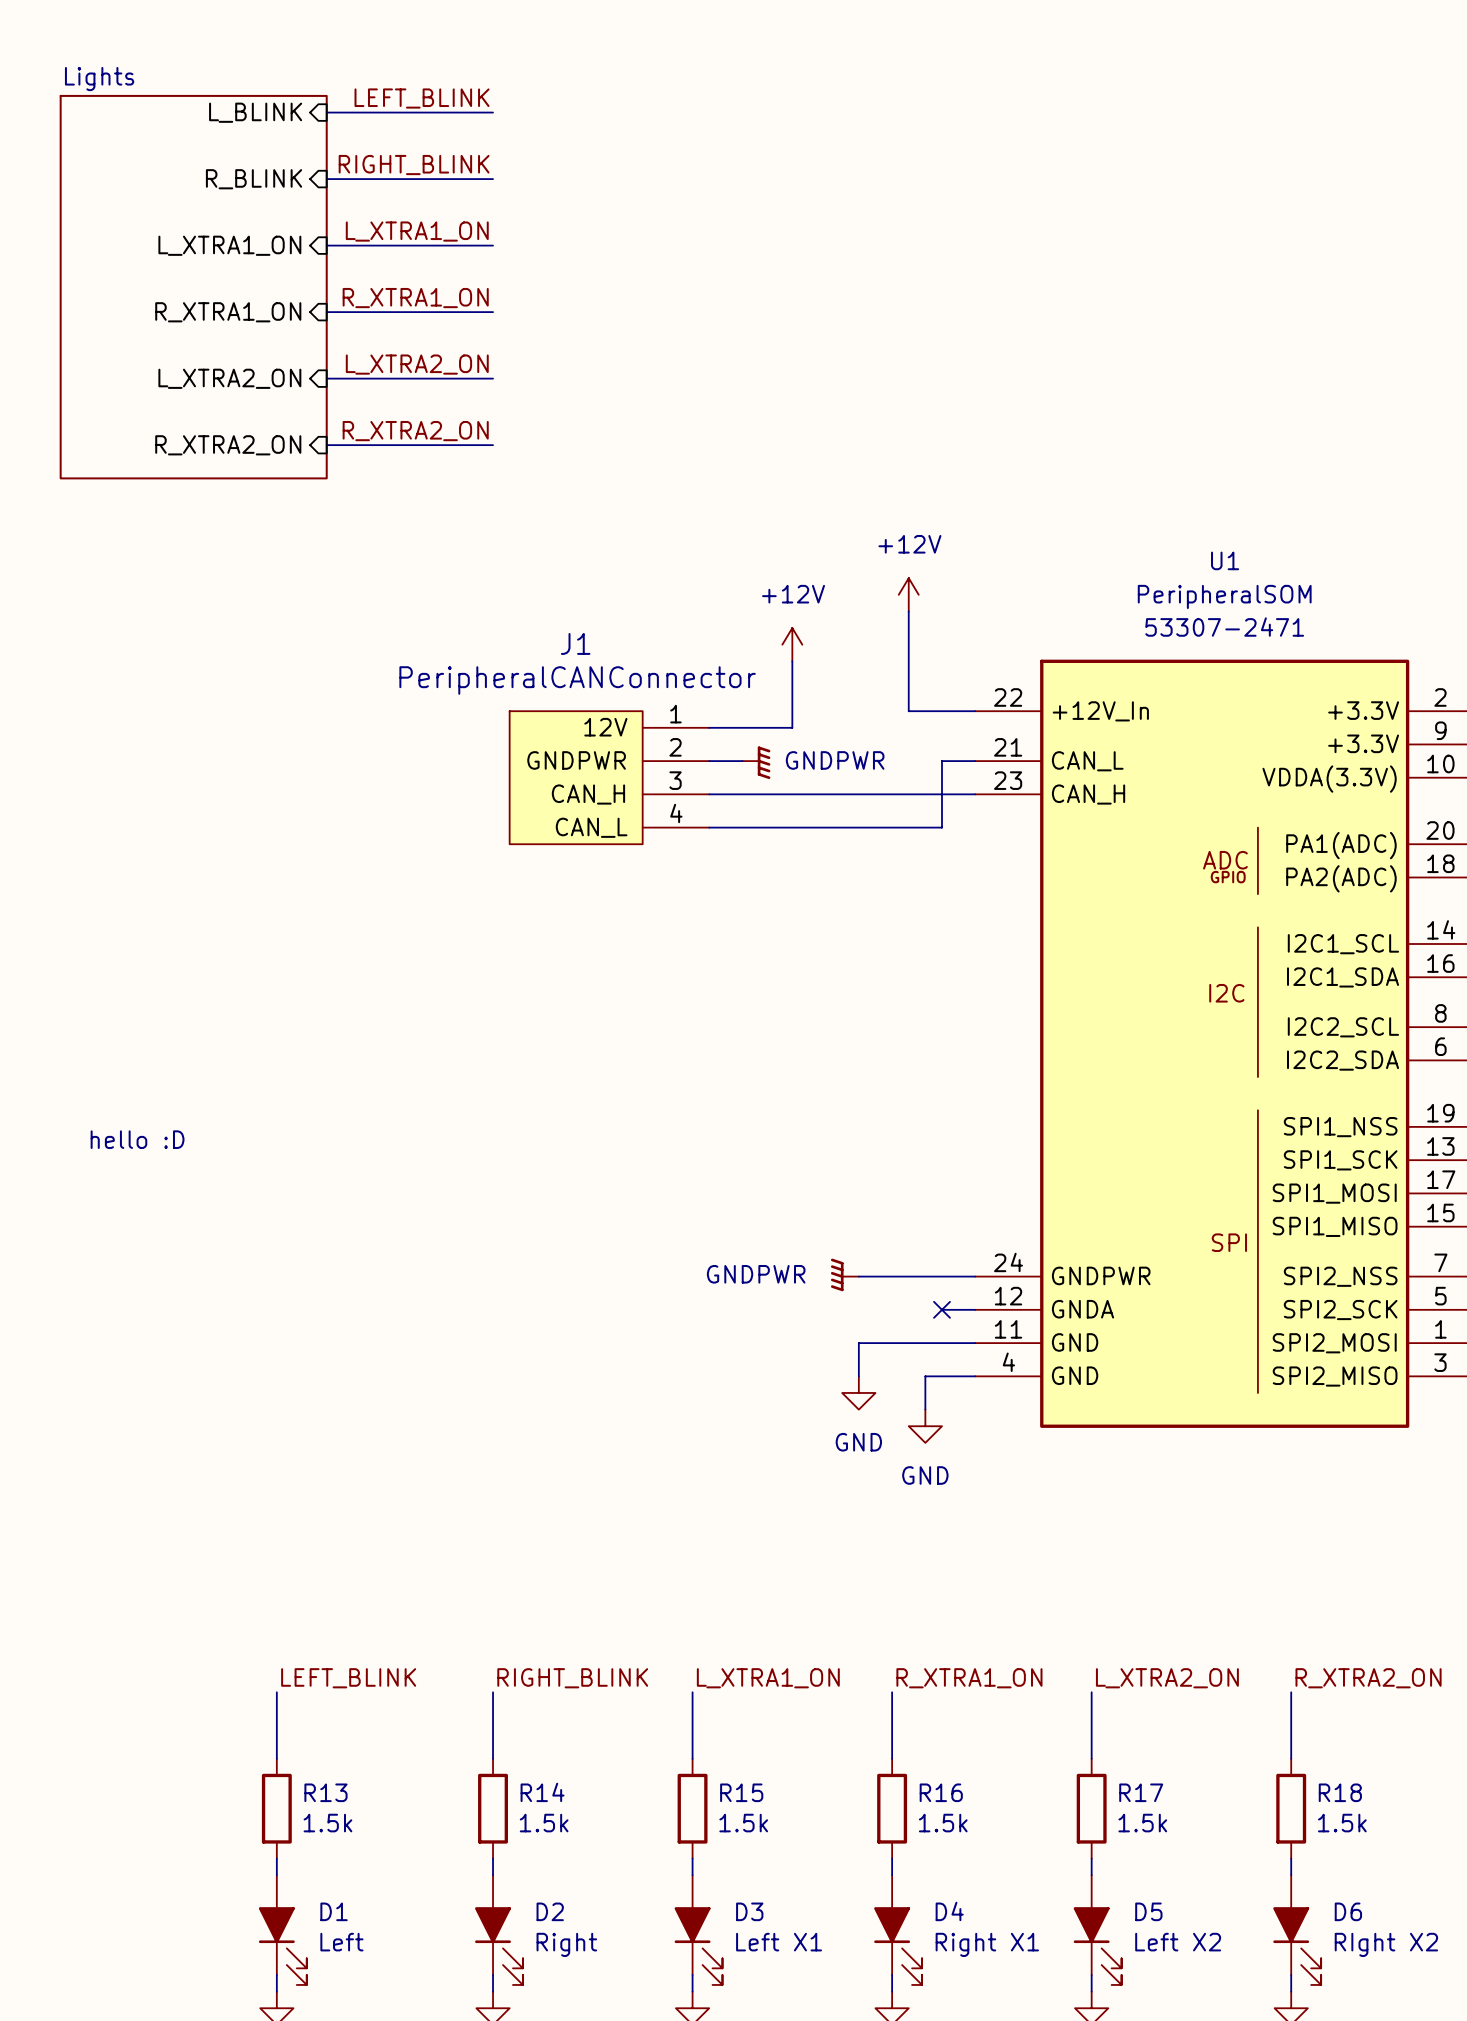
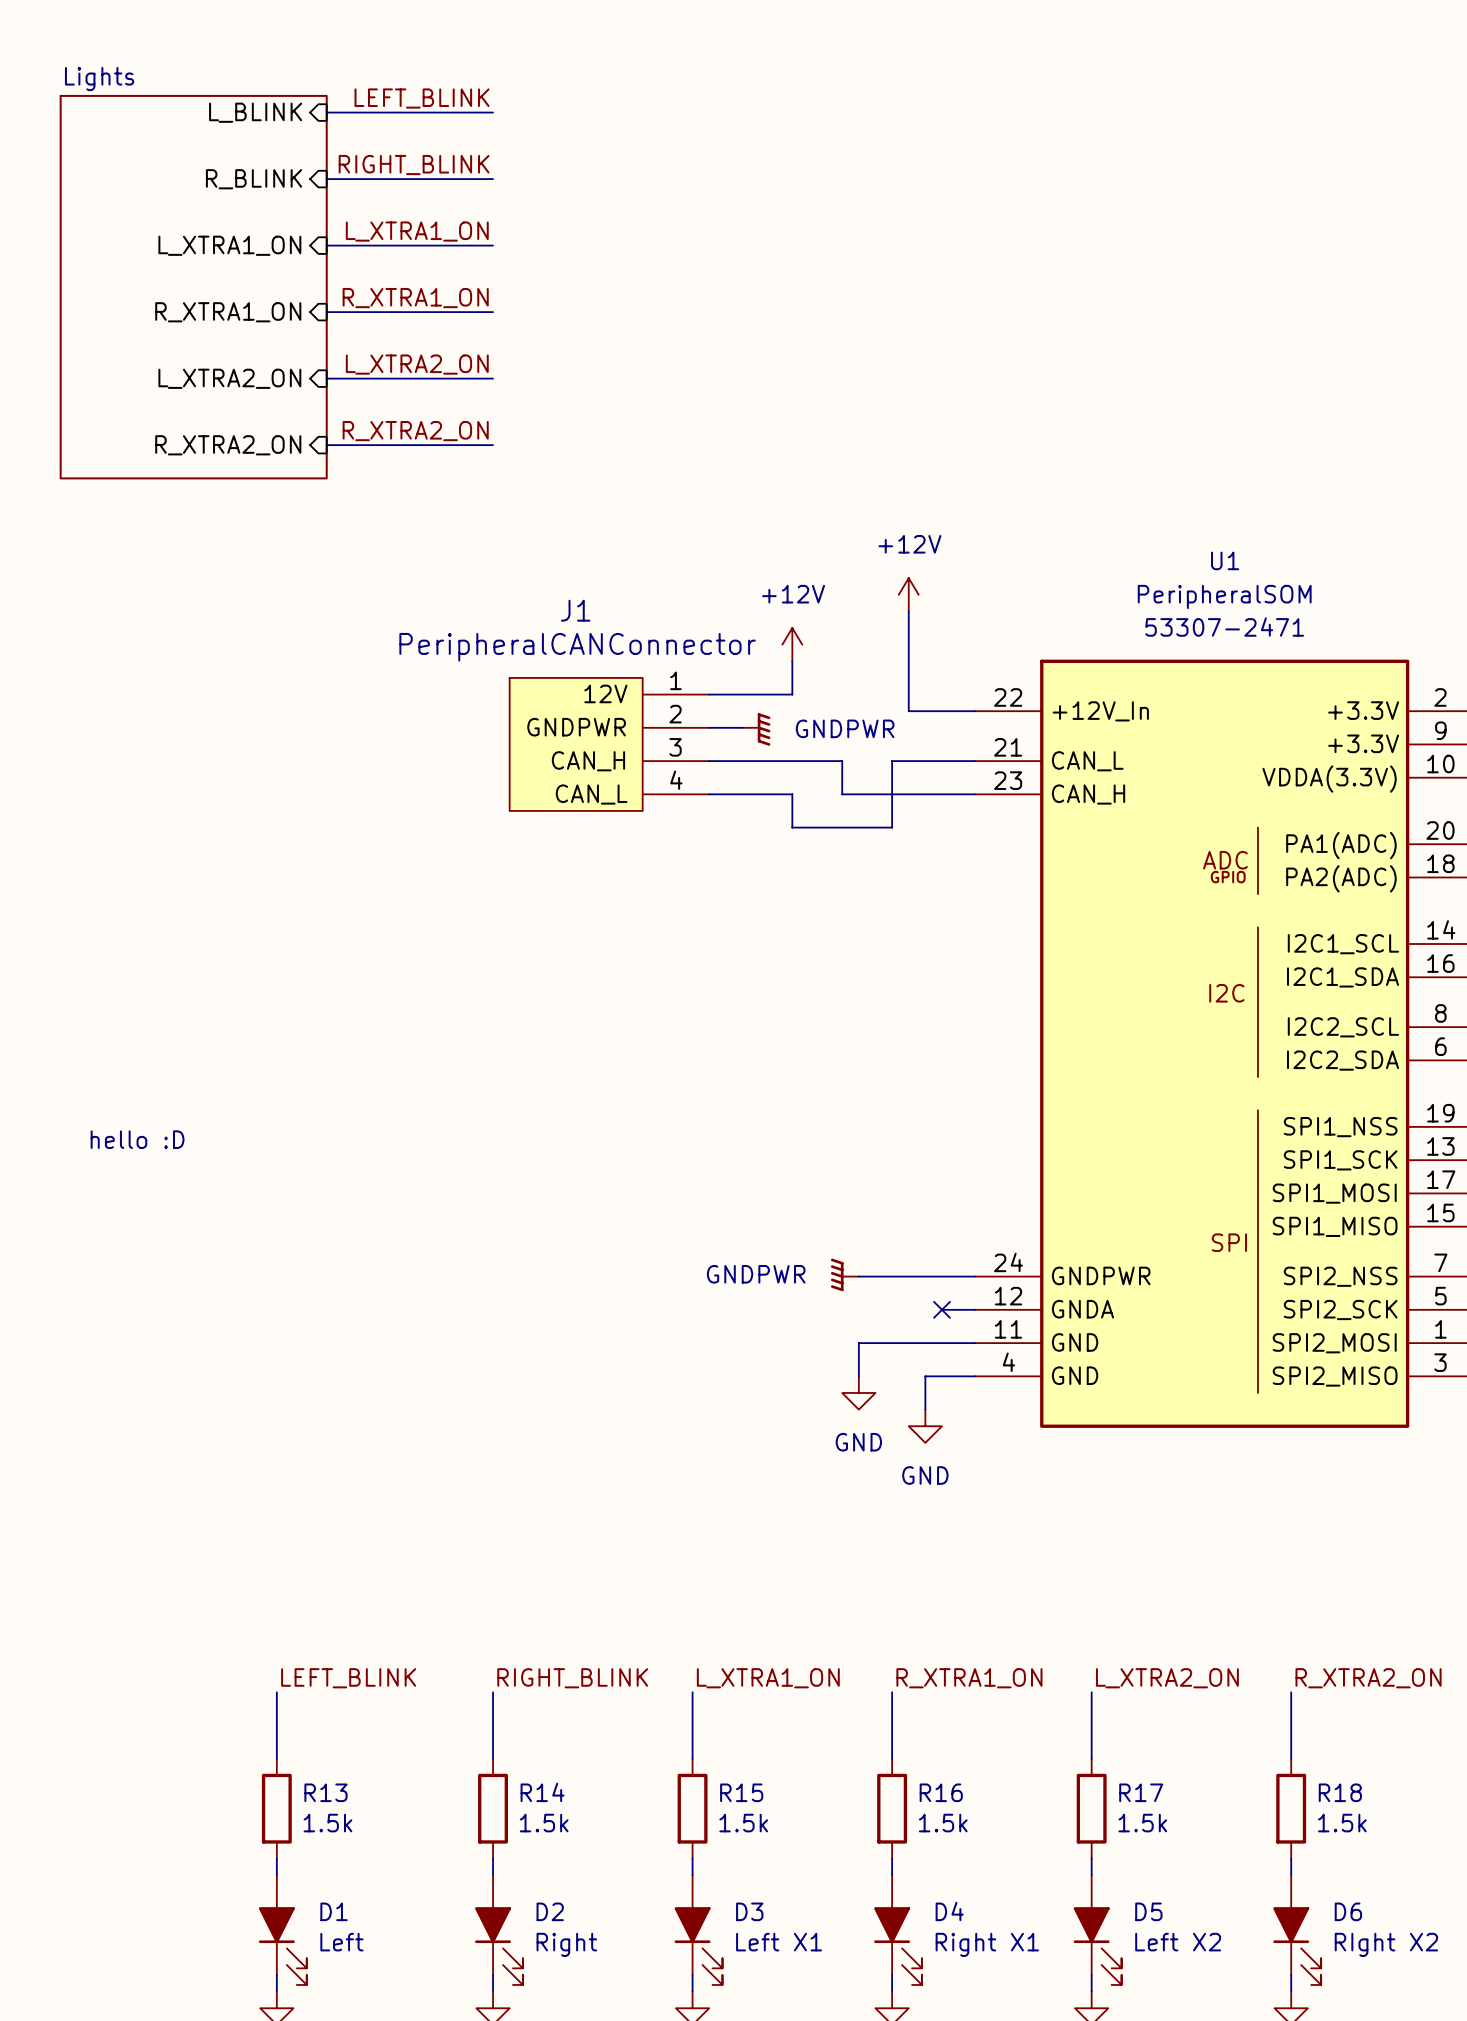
wire: (792, 694) (792, 727) (742, 727) -> (792, 694) (709, 694)
power symbol text position: GNDPWR (835, 760) -> GNDPWR (845, 728)
wire: none -> (742, 761) (842, 761) (842, 794)
wire: (942, 761) (942, 827) (892, 827) -> (942, 761) (892, 761) (892, 827)
power symbol position: GNDPWR (756, 762) -> GNDPWR (756, 729)
J1 position: (609, 777) -> (609, 744)
wire: (792, 794) (842, 794) -> (792, 794) (792, 827)
wire: (709, 827) (792, 827) -> none

